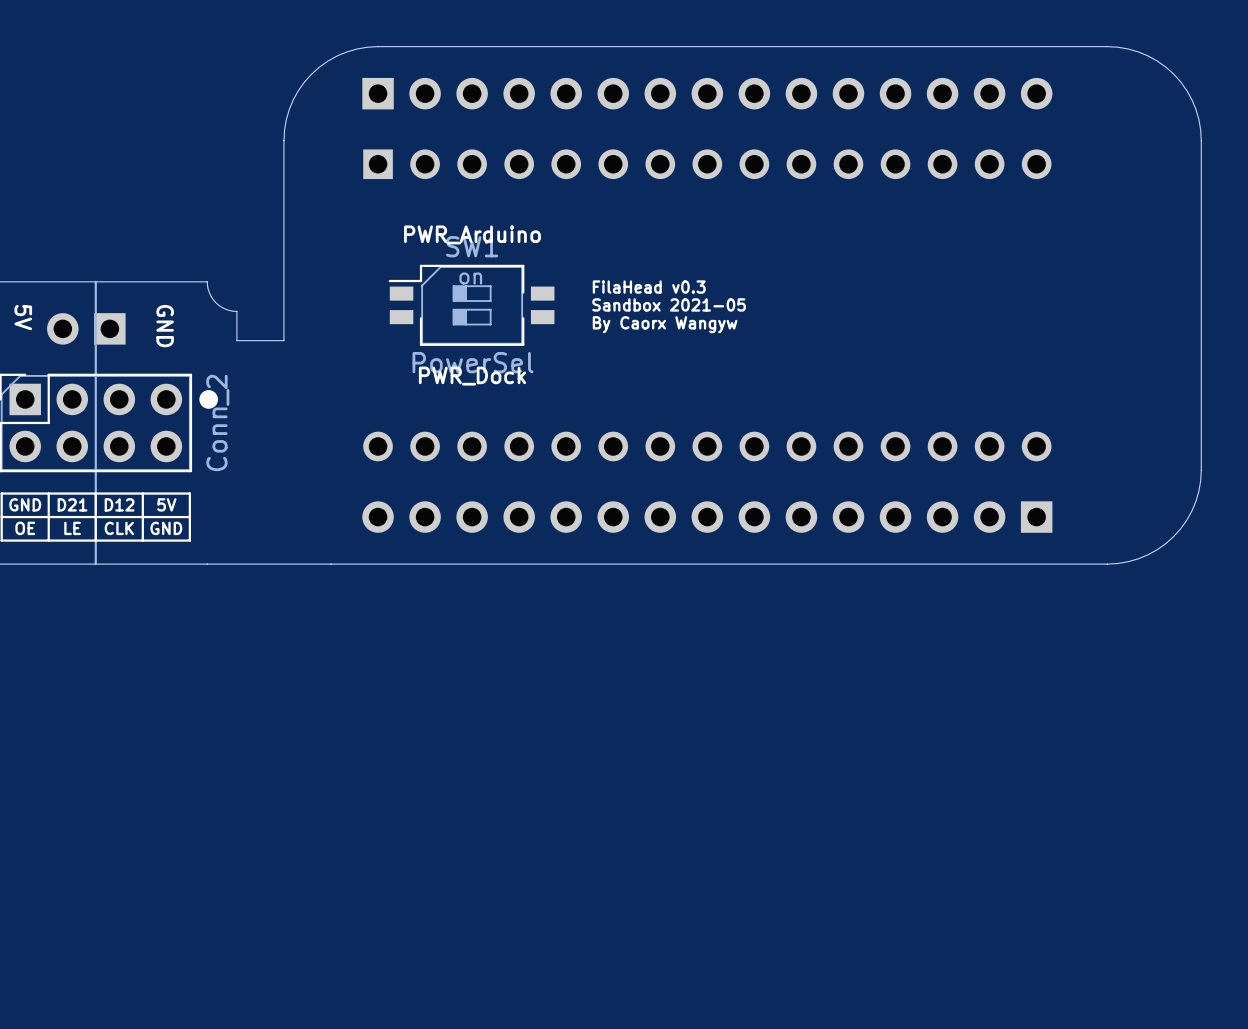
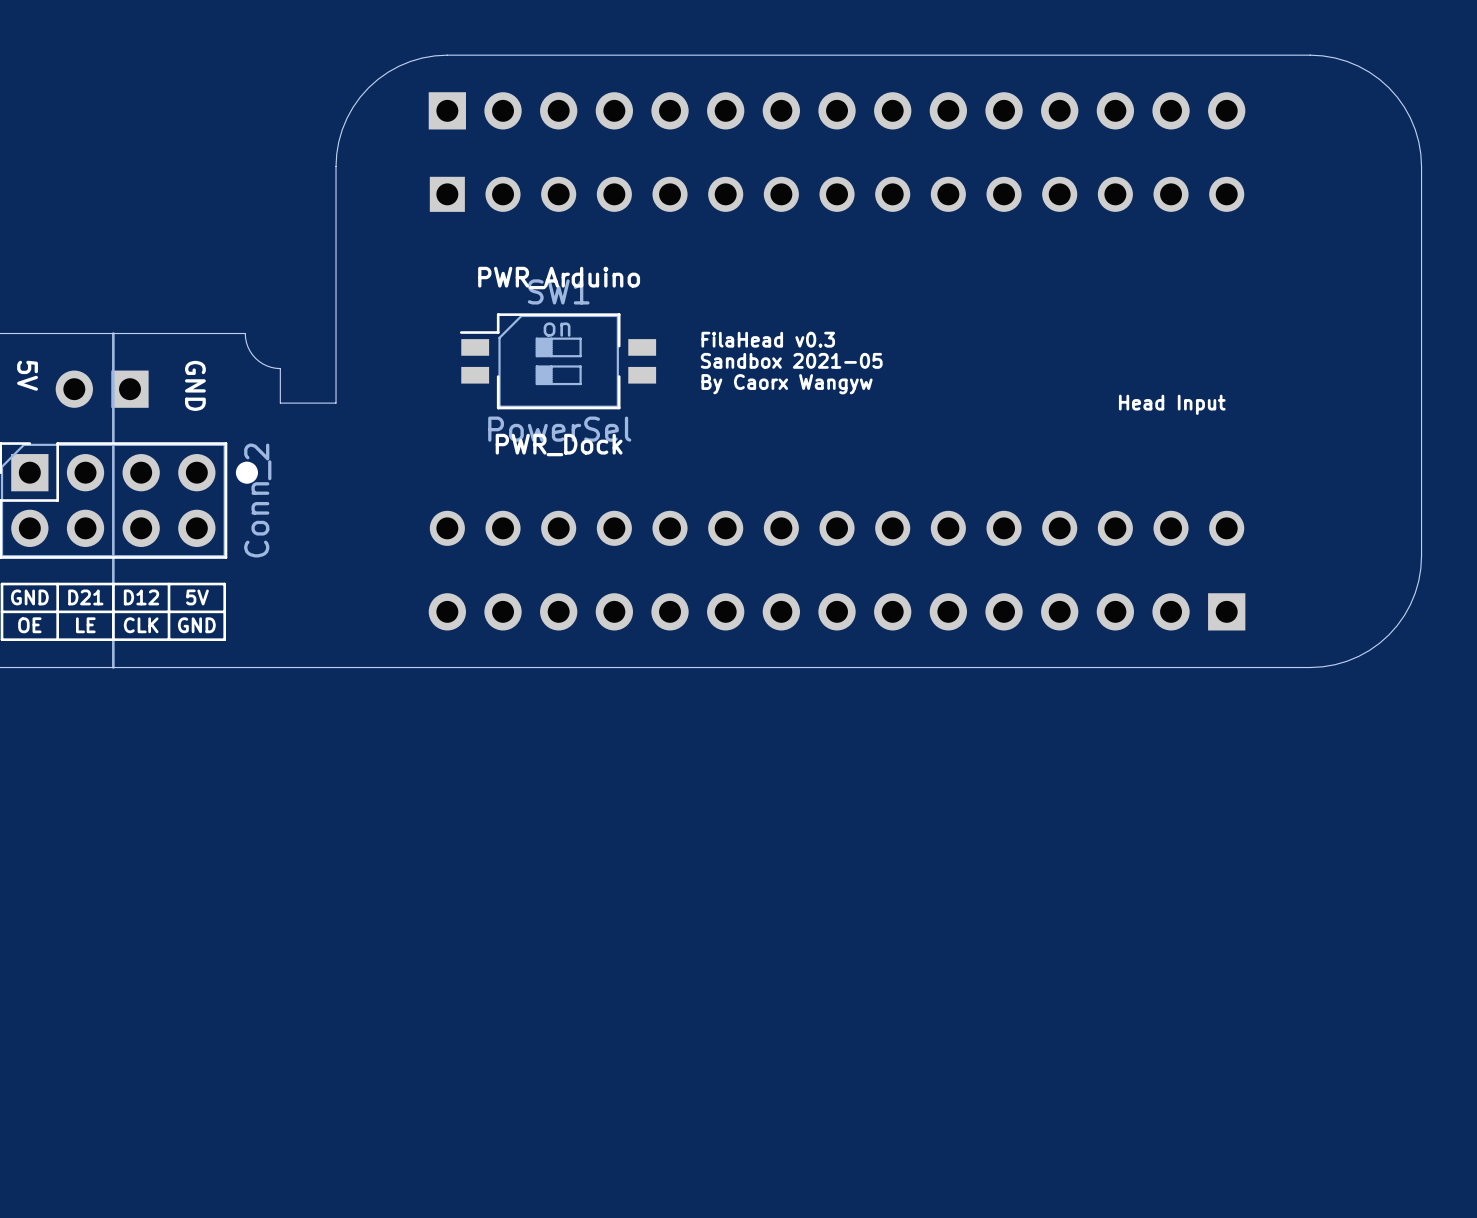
text: none -> Head Input (1172, 404)

